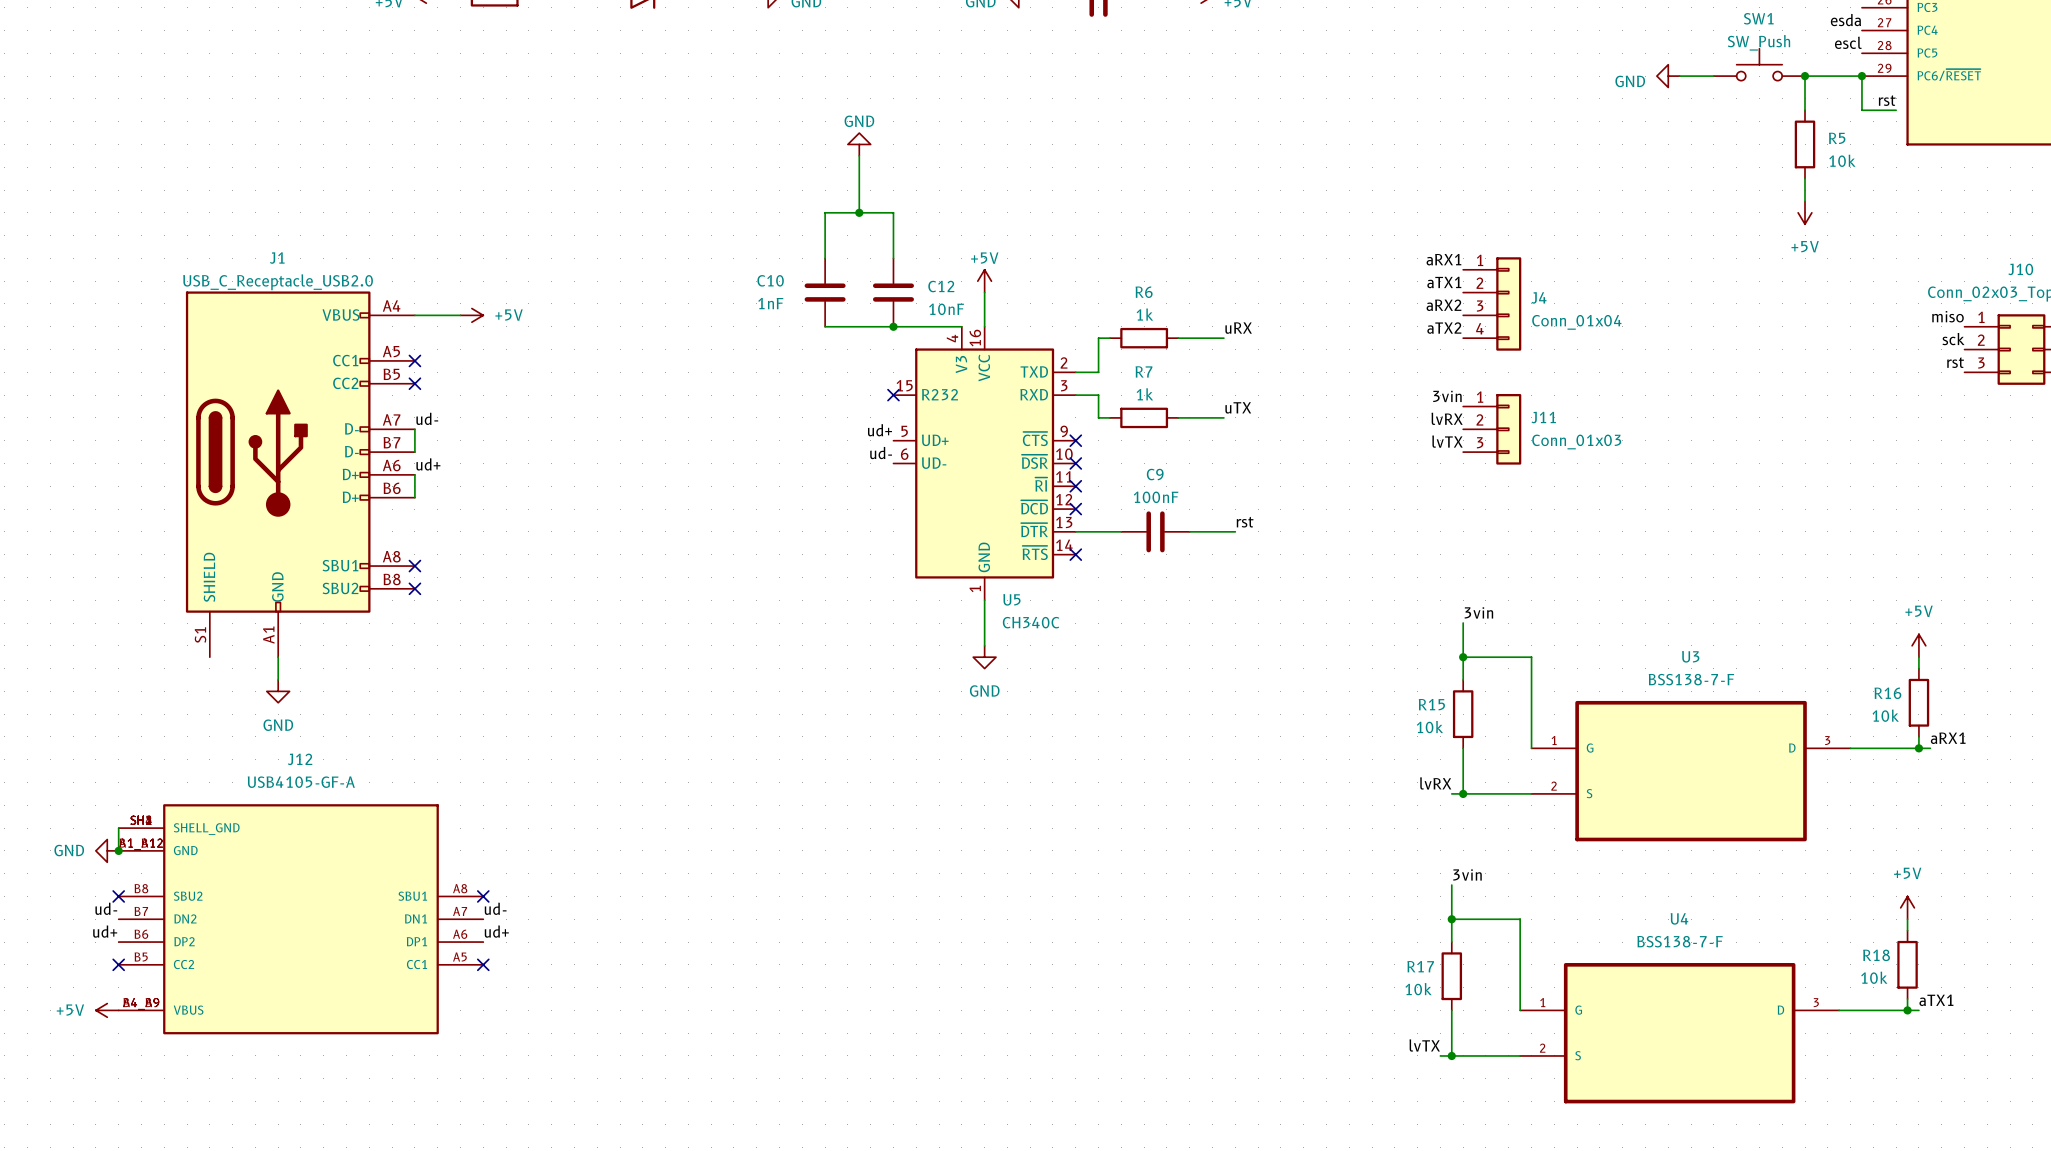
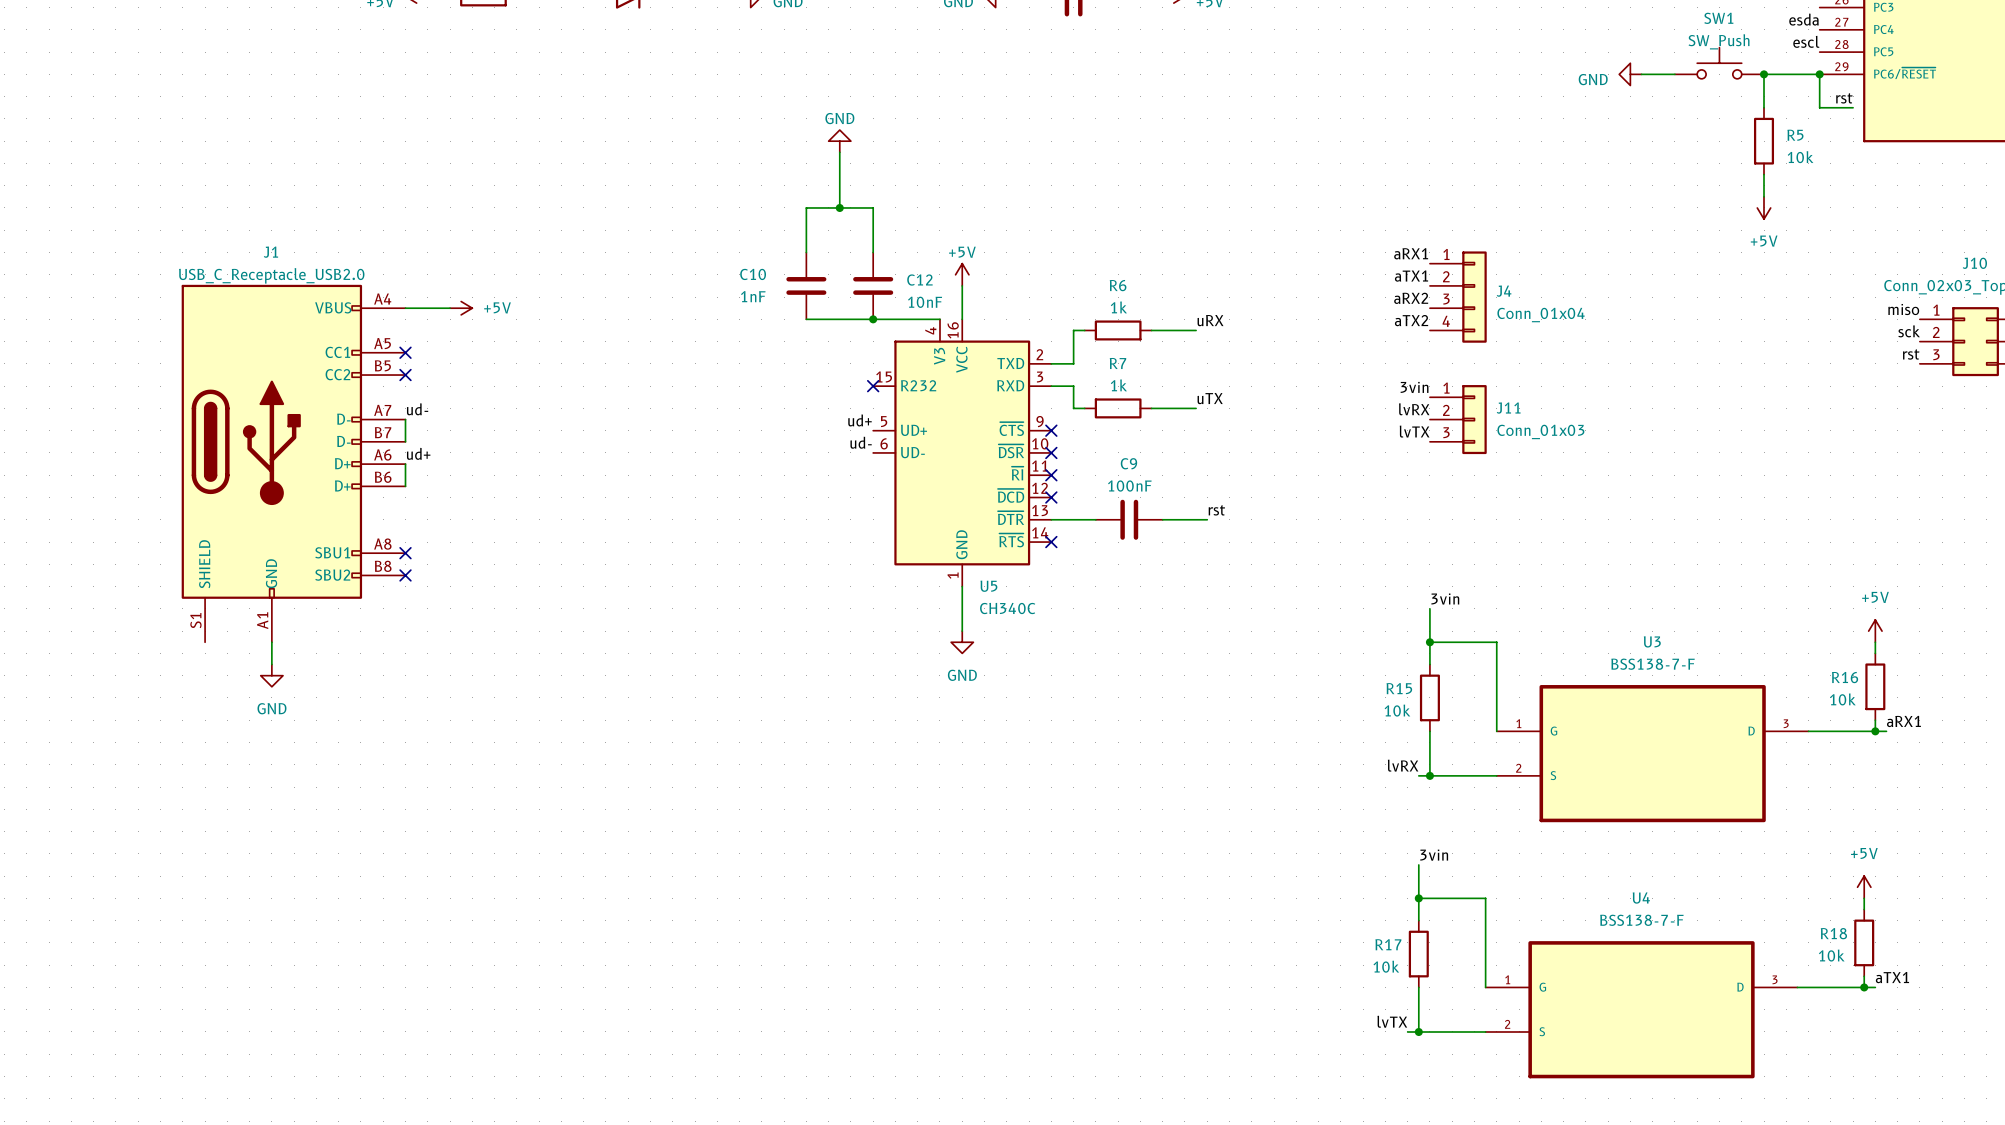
wire: (118, 828) (118, 850) -> none
power symbol: GND (107, 850) -> none
junction: (118, 850) -> none
no-connect mark: (118, 896) -> none
no-connect mark: (483, 896) -> none
label: ud- (106, 908) -> none
label: ud- (495, 908) -> none
J12: USB4105-GF-A (300, 919) -> none
label: ud+ (105, 931) -> none
label: ud+ (496, 931) -> none
no-connect mark: (118, 964) -> none
no-connect mark: (483, 964) -> none
power symbol: +5V (107, 1010) -> none

